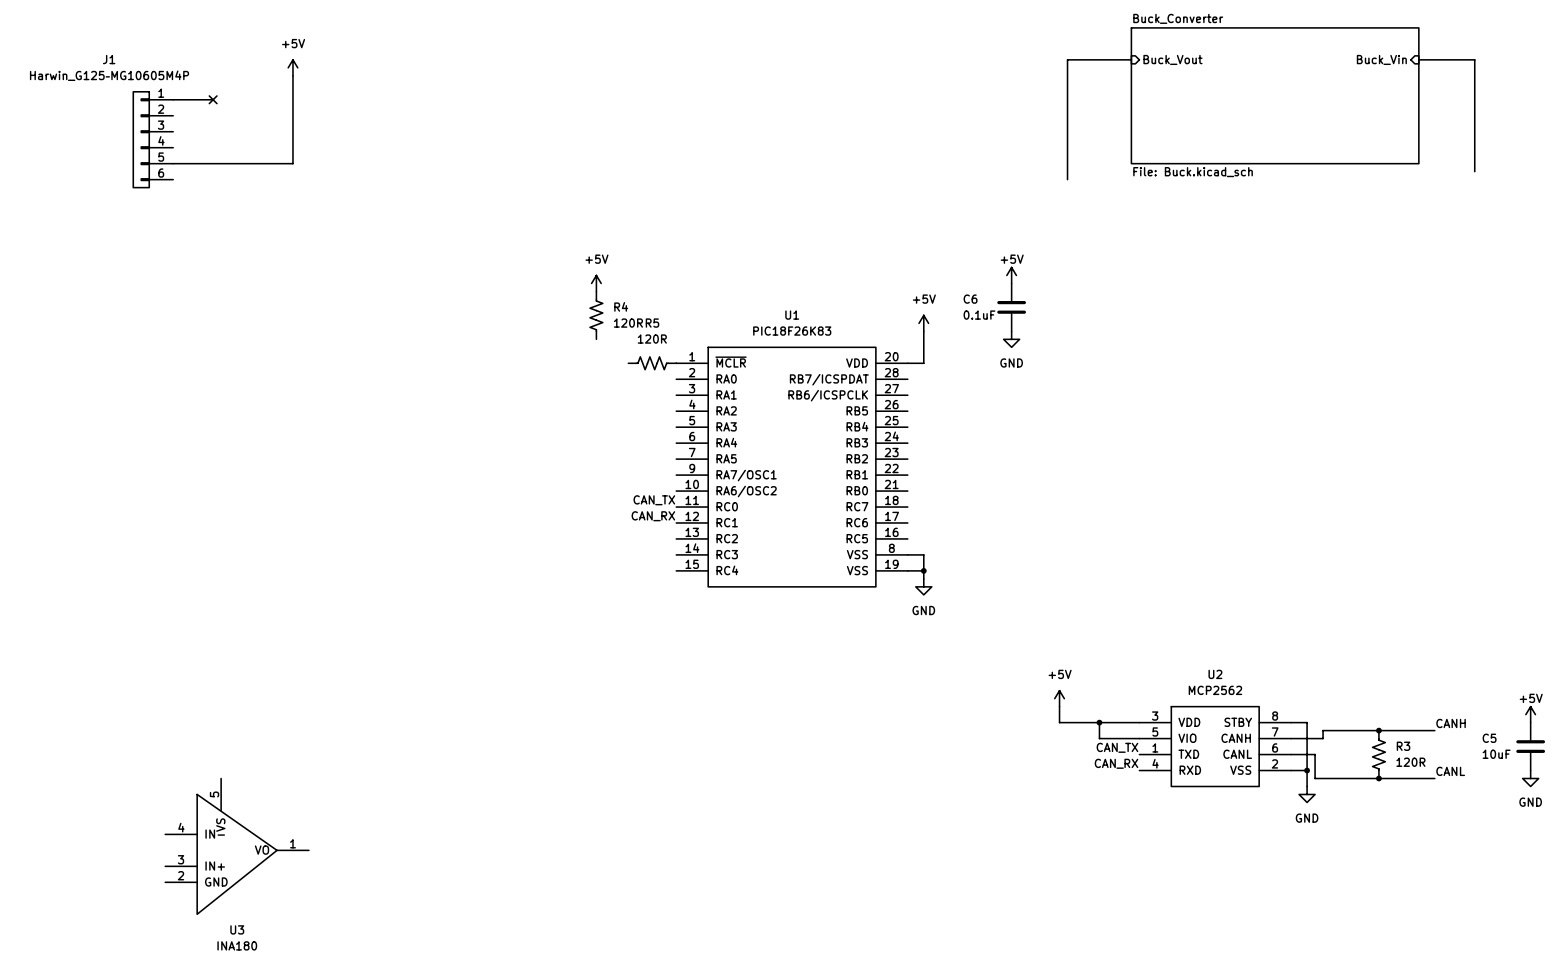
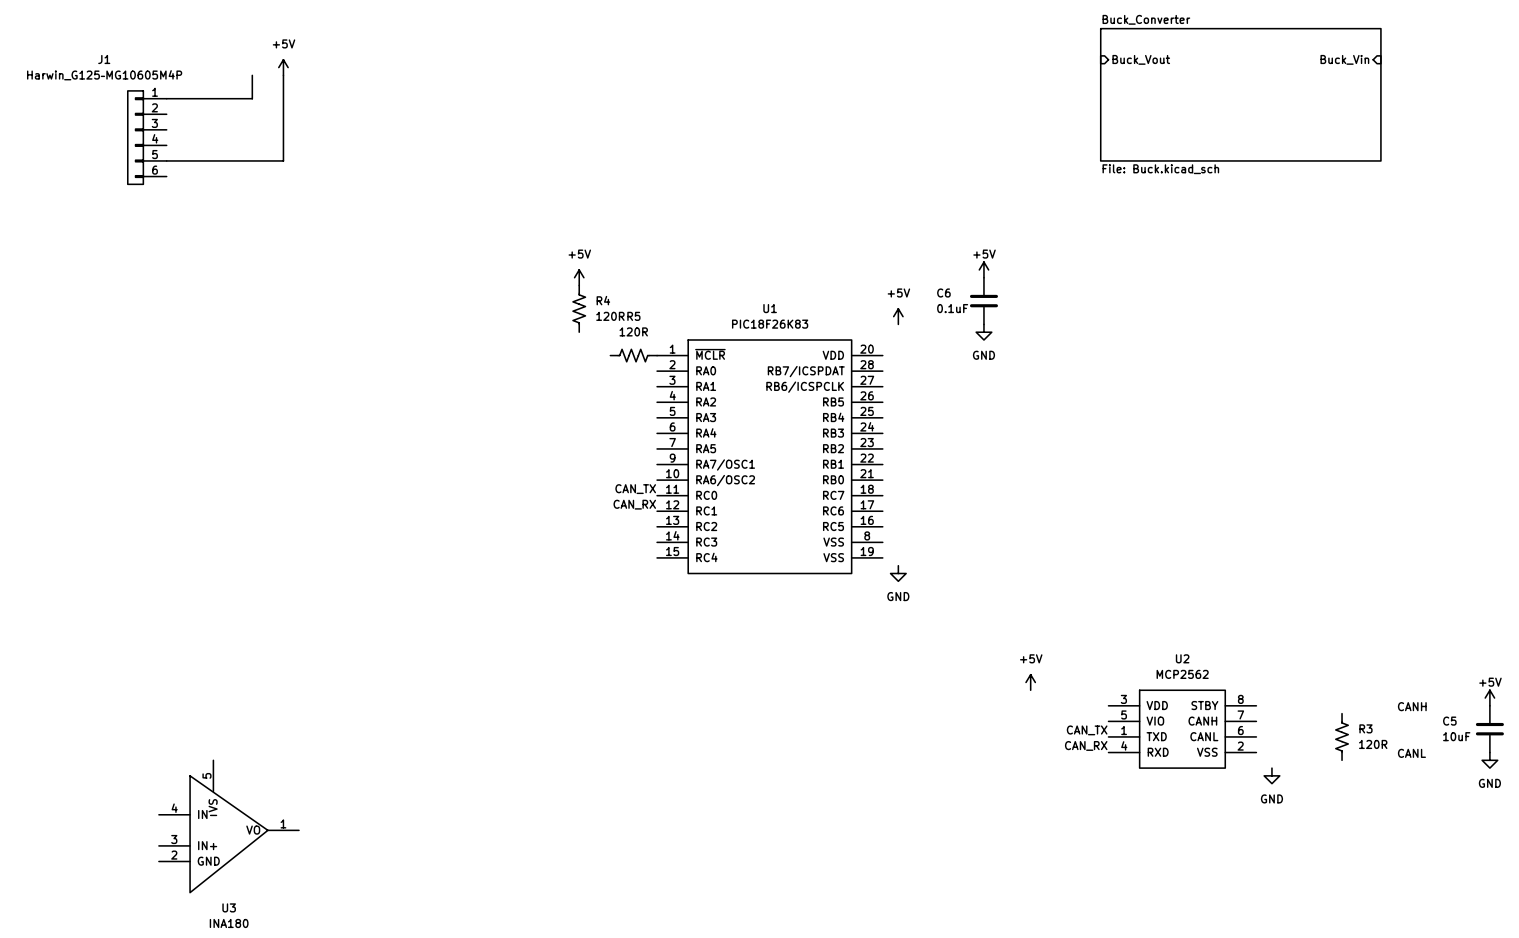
wire: (1131, 59) (1067, 59) (1067, 179) -> none
wire: (1418, 59) (1474, 59) (1474, 171) -> none
wire: none -> (252, 75) (252, 98) (205, 98)
no-connect mark: (213, 99) -> none
wire: (923, 331) (923, 363) (907, 363) -> none
wire: (907, 554) (923, 554) (923, 578) -> none
wire: (907, 570) (923, 570) -> none
junction: (923, 570) -> none
wire: (1059, 706) (1059, 722) (1139, 722) -> none
wire: (1099, 722) (1099, 738) (1139, 738) -> none
junction: (1099, 722) -> none
wire: (1291, 722) (1307, 722) (1307, 786) -> none
junction: (1378, 730) -> none
wire: (1434, 730) (1323, 730) (1323, 738) (1291, 738) -> none
wire: (1291, 754) (1315, 754) (1315, 778) (1434, 778) -> none
wire: (1291, 770) (1307, 770) -> none
junction: (1307, 770) -> none
junction: (1378, 778) -> none

